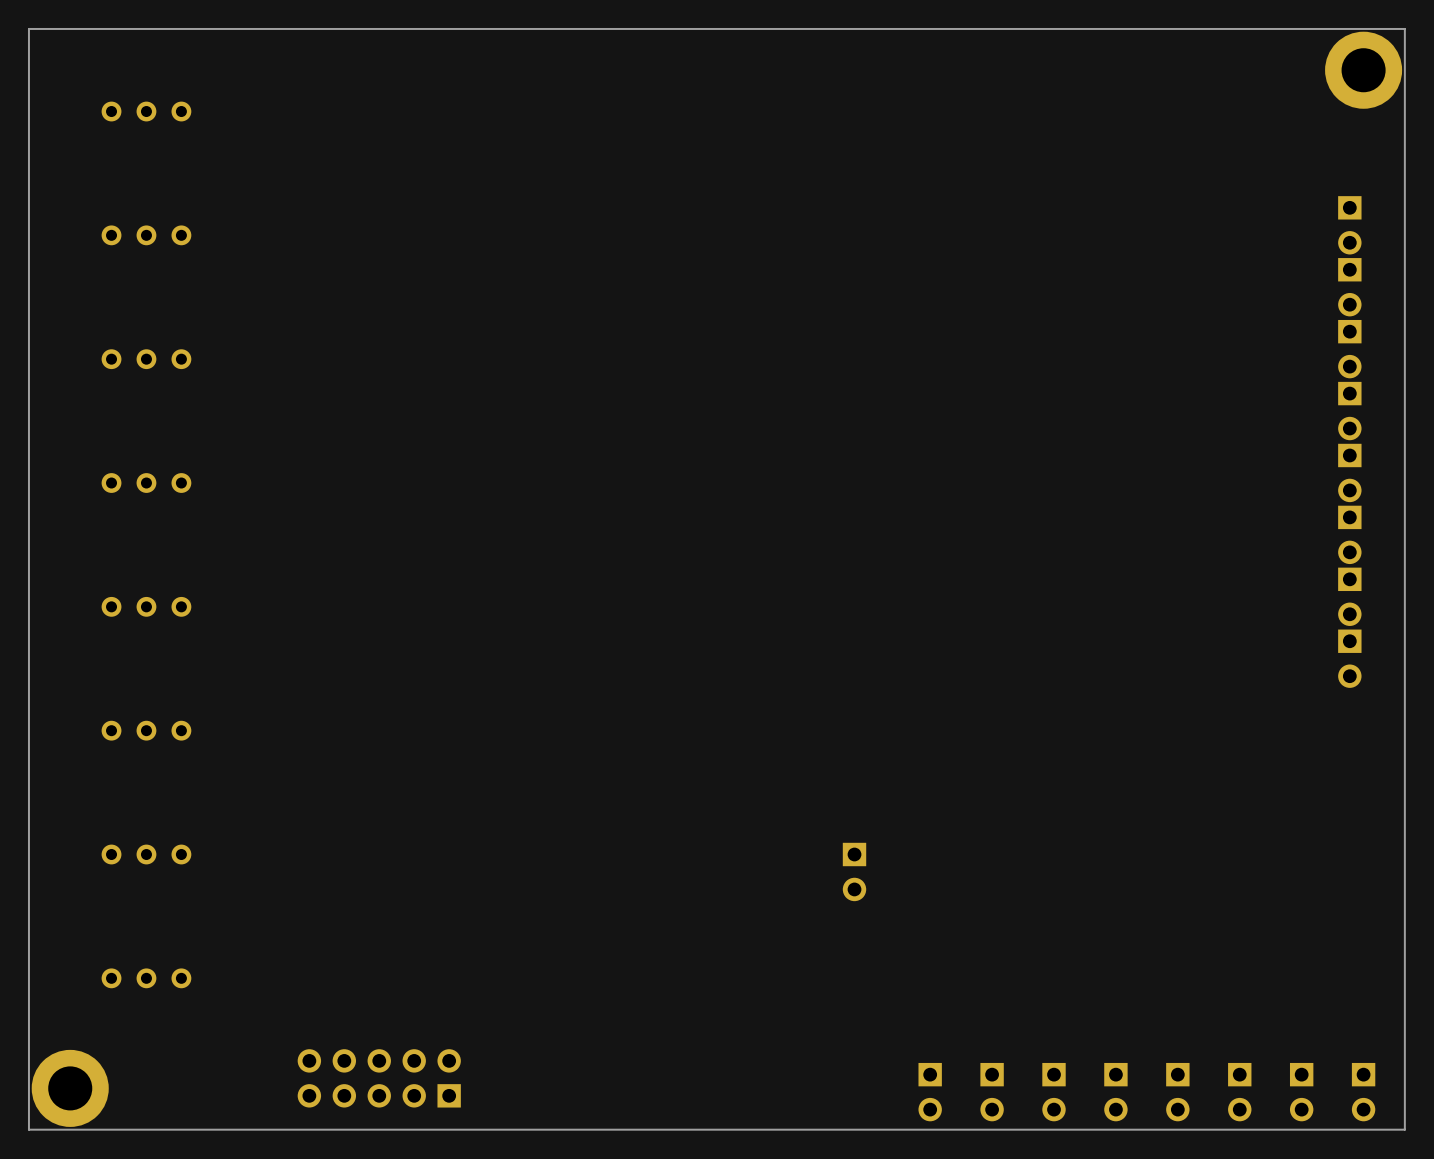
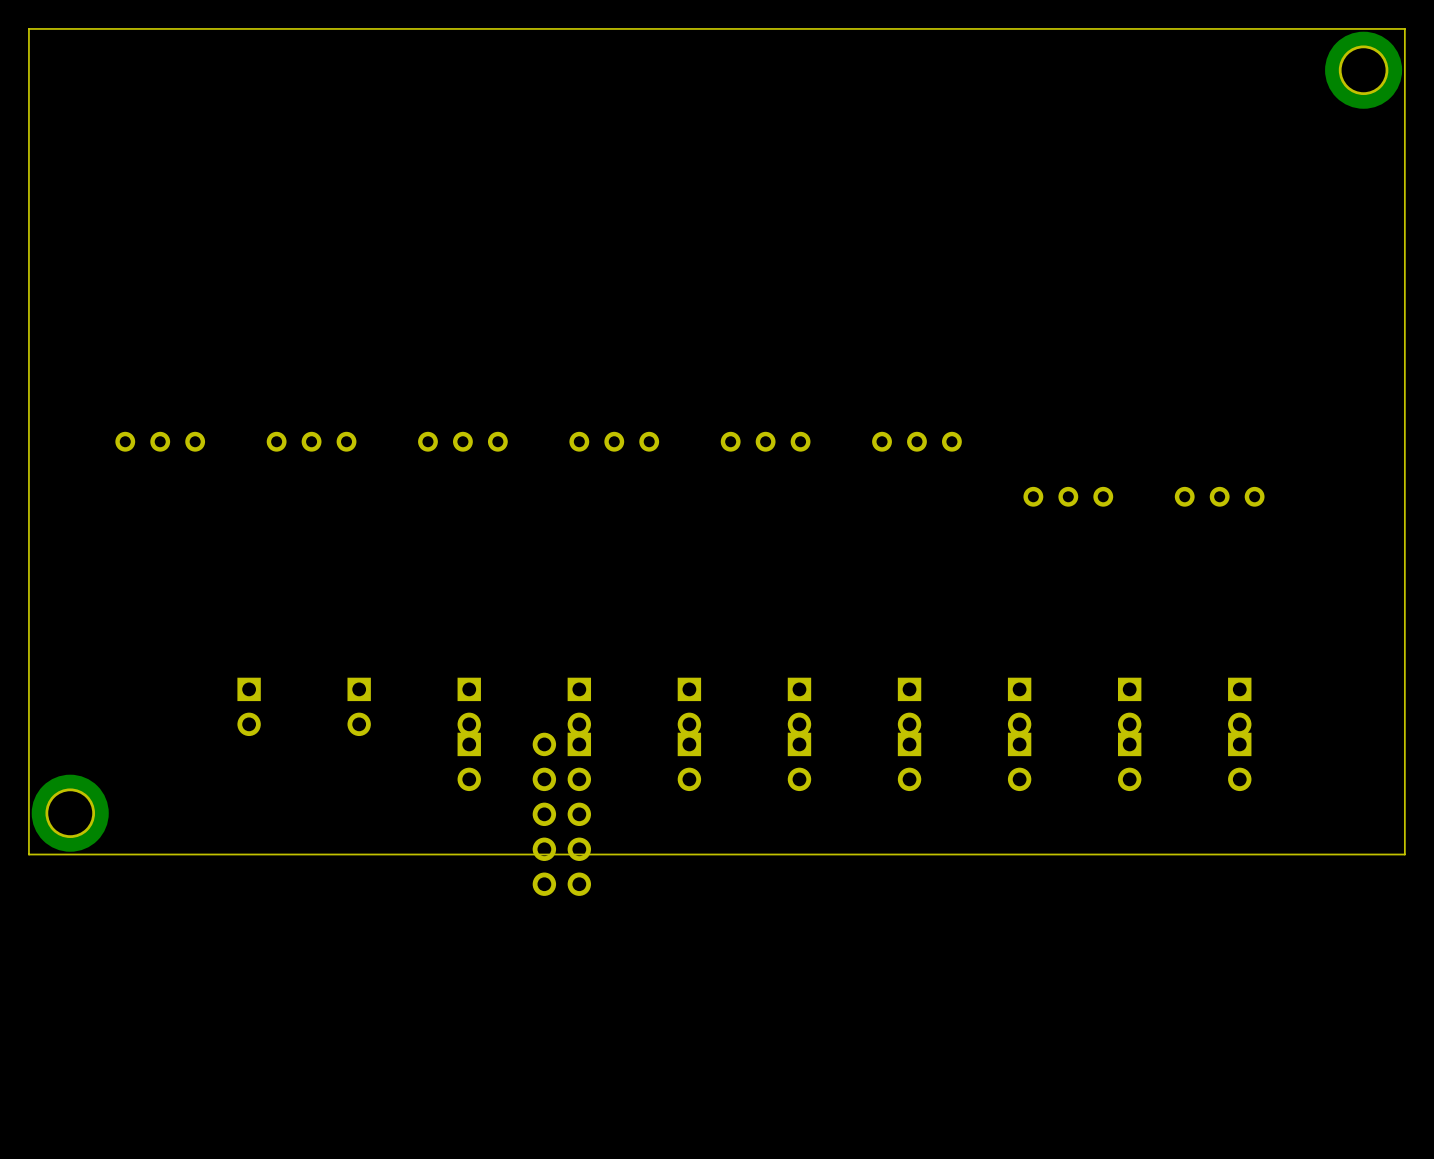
part: (146, 111) -> none
part: (1349, 225) -> none
part: (146, 235) -> none
part: (1349, 287) -> none
part: (1349, 349) -> none
part: (146, 359) -> none
part: (1349, 411) -> none
part: none -> (160, 441)
part: none -> (311, 441)
part: none -> (462, 441)
part: none -> (614, 441)
part: none -> (765, 441)
part: none -> (916, 441)
part: (1349, 472) -> none
part: (146, 483) -> none
part: none -> (1068, 496)
part: none -> (1219, 496)
part: (1349, 534) -> none
part: (1349, 596) -> none
part: (146, 606) -> none
part: (1349, 658) -> none
part: none -> (249, 706)
part: none -> (359, 706)
part: none -> (469, 706)
part: none -> (579, 706)
part: none -> (689, 706)
part: none -> (799, 706)
part: none -> (909, 706)
part: none -> (1019, 706)
part: none -> (1129, 706)
part: none -> (1239, 706)
part: (146, 730) -> none
part: none -> (469, 761)
part: none -> (689, 761)
part: none -> (799, 761)
part: none -> (909, 761)
part: none -> (1019, 761)
part: none -> (1129, 761)
part: none -> (1239, 761)
part: (146, 854) -> none
board edge: (1404, 854) (1404, 1129) (28, 1129) (28, 854) -> (1404, 854) (28, 854)
part: (854, 871) -> none
part: (146, 978) -> none
part rotation: 0° (379, 1078) -> 90° counterclockwise (561, 814)
part position: (379, 1078) -> (561, 814)
part position: (70, 1088) -> (70, 813)
part: (930, 1092) -> none
part: (992, 1092) -> none
part: (1054, 1092) -> none
part: (1115, 1092) -> none
part: (1177, 1092) -> none
part: (1239, 1092) -> none
part: (1301, 1092) -> none
part: (1363, 1092) -> none

